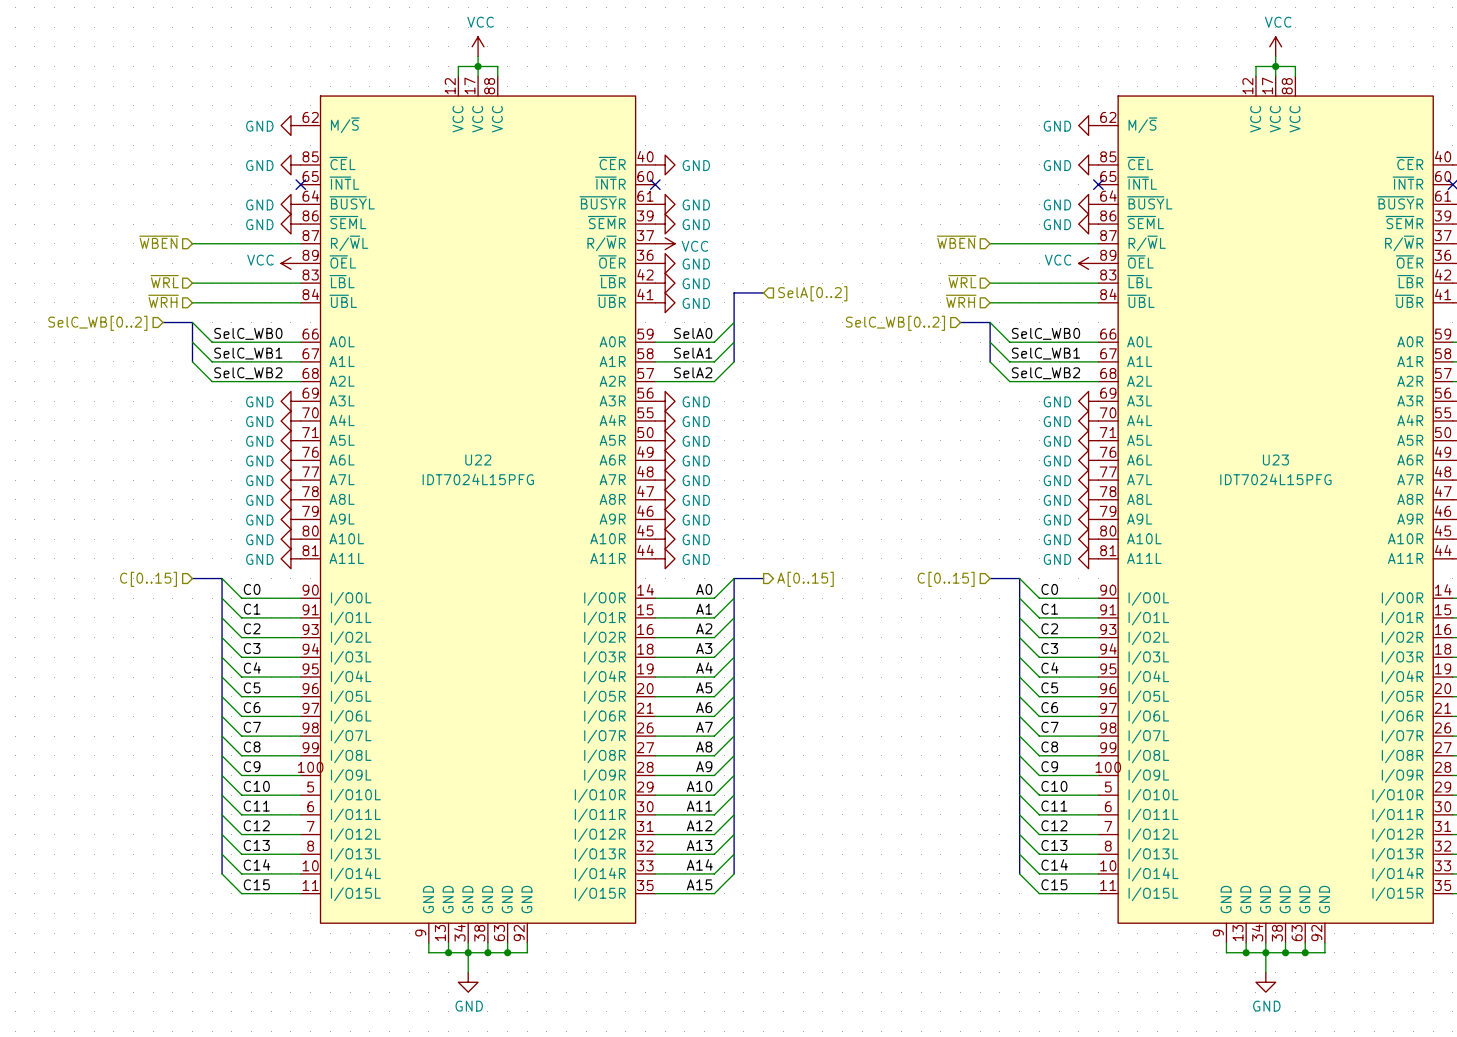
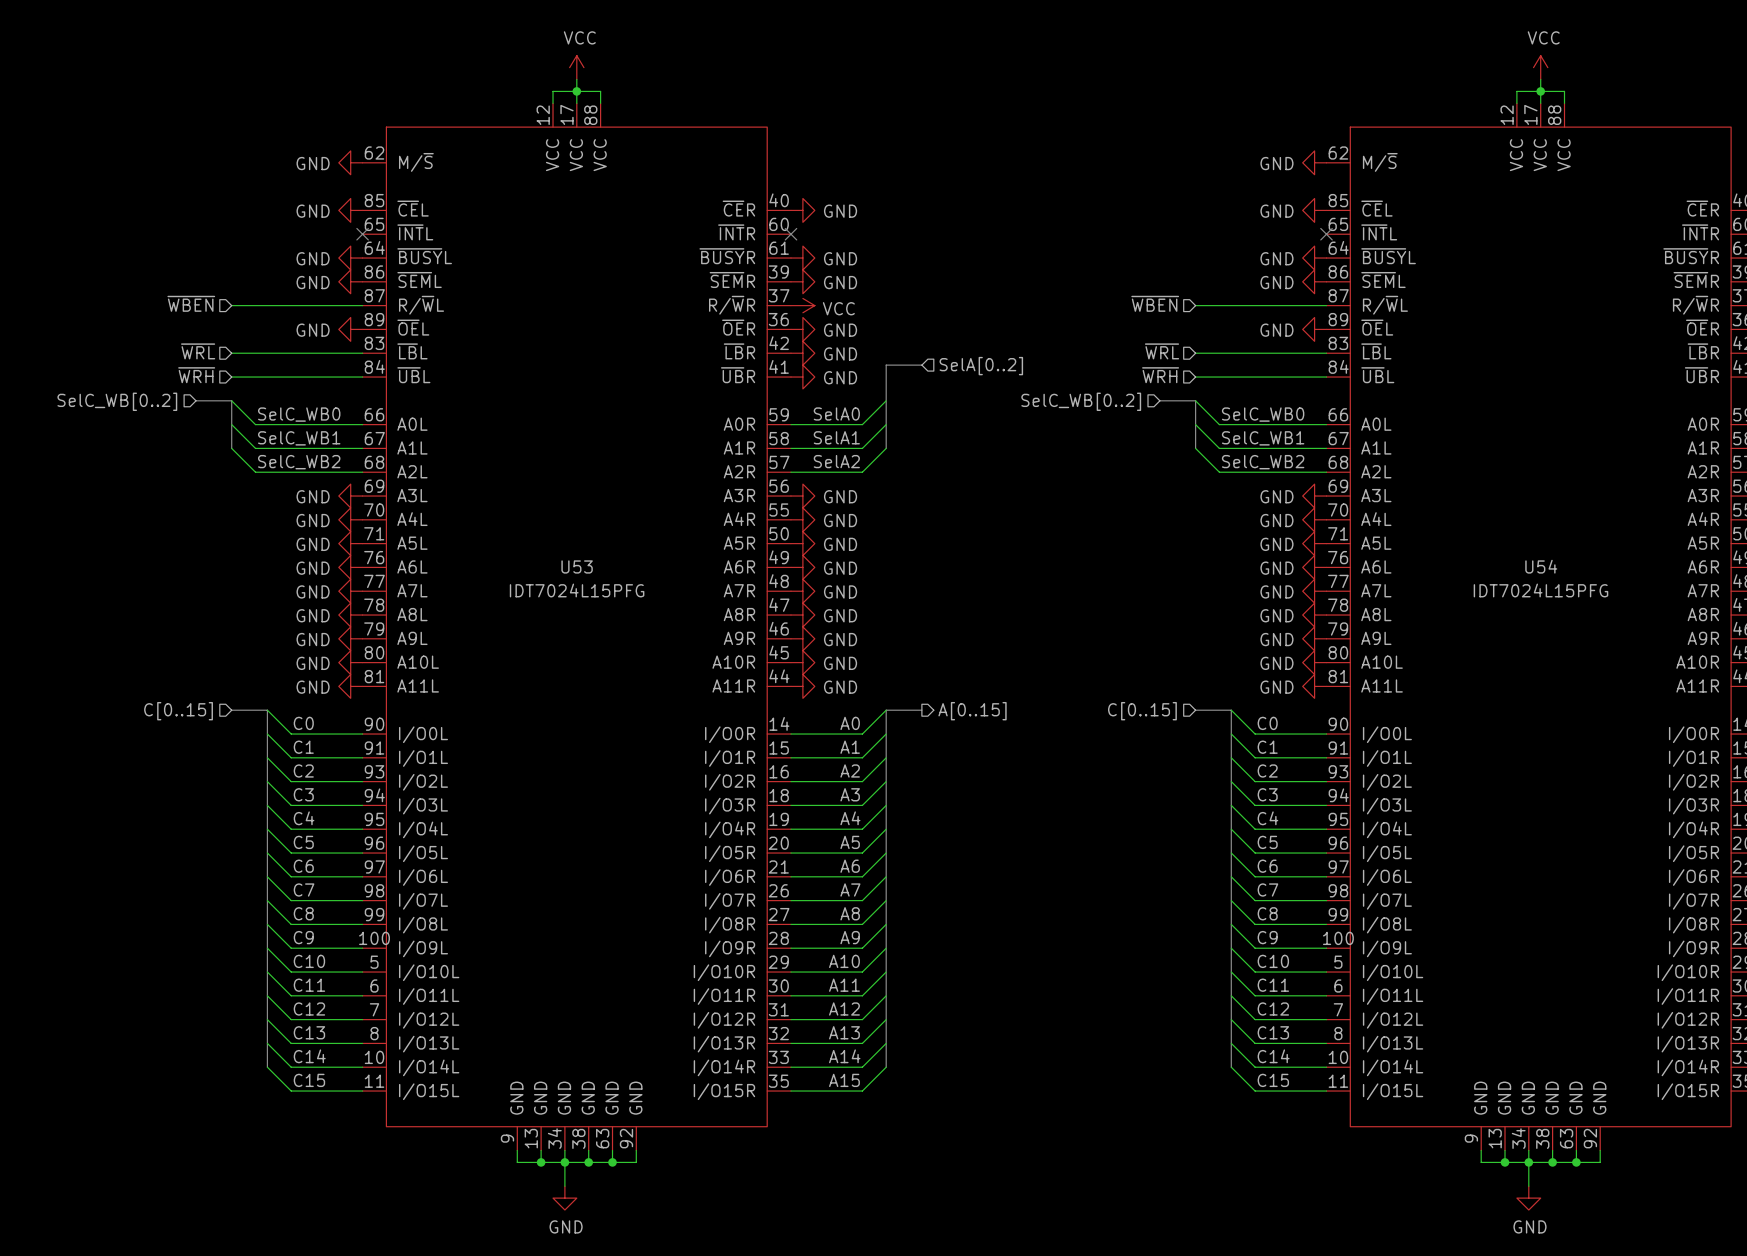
power symbol: VCC (290, 263) -> GND (350, 329)
power symbol: VCC (1088, 263) -> GND (1314, 329)
U22 name: U22 (478, 460) -> U53 (577, 566)
U23 name: U23 (1275, 460) -> U54 (1541, 566)

